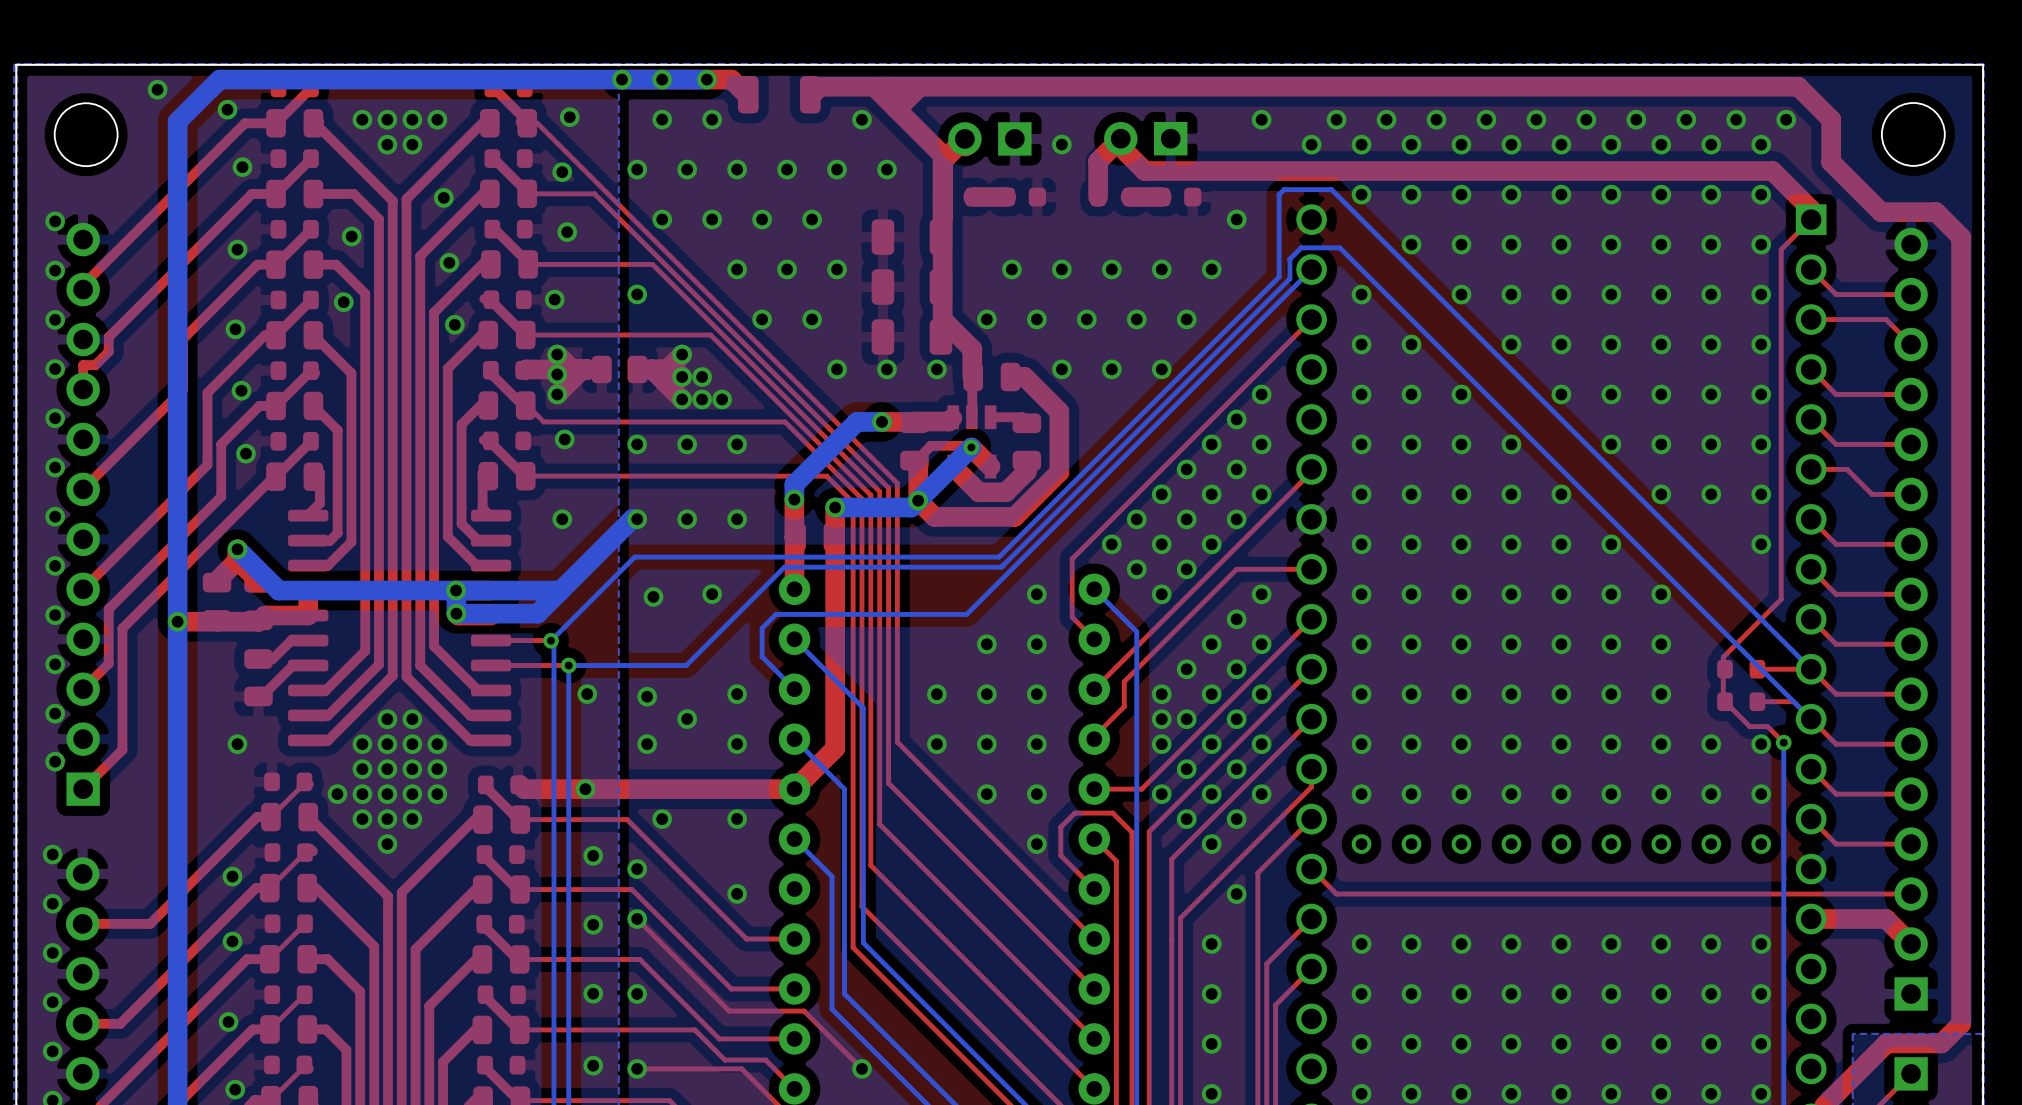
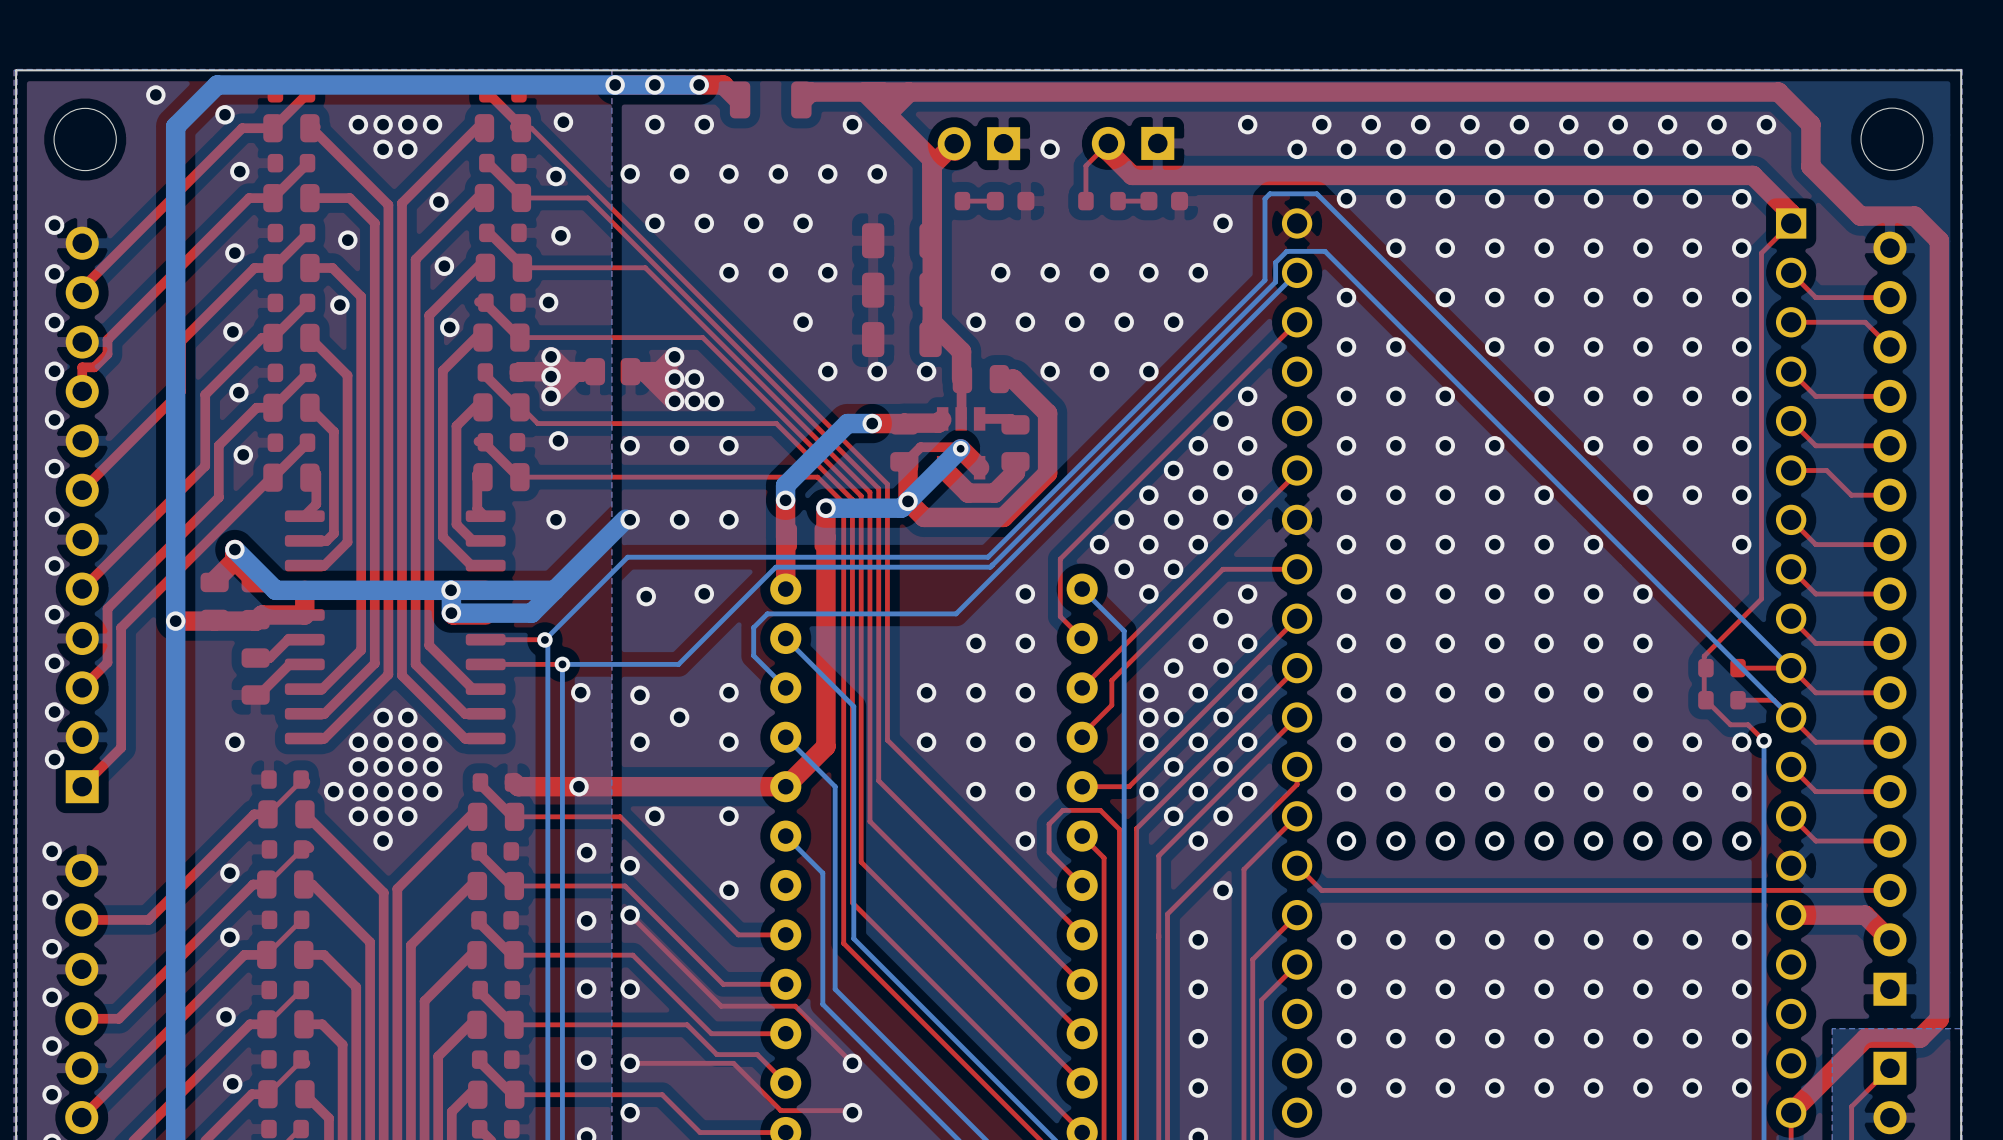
top track width: thick (1120, 138) (1098, 161) (1098, 197) -> thin (1108, 143) (1085, 165) (1085, 201)
top track width: thick (1006, 197) (973, 197) -> thin (995, 201) (962, 201)
top track width: thick (1161, 197) (1130, 197) -> thin (1148, 201) (1118, 201)
via: (637, 294) -> none
via: (762, 319) -> none

